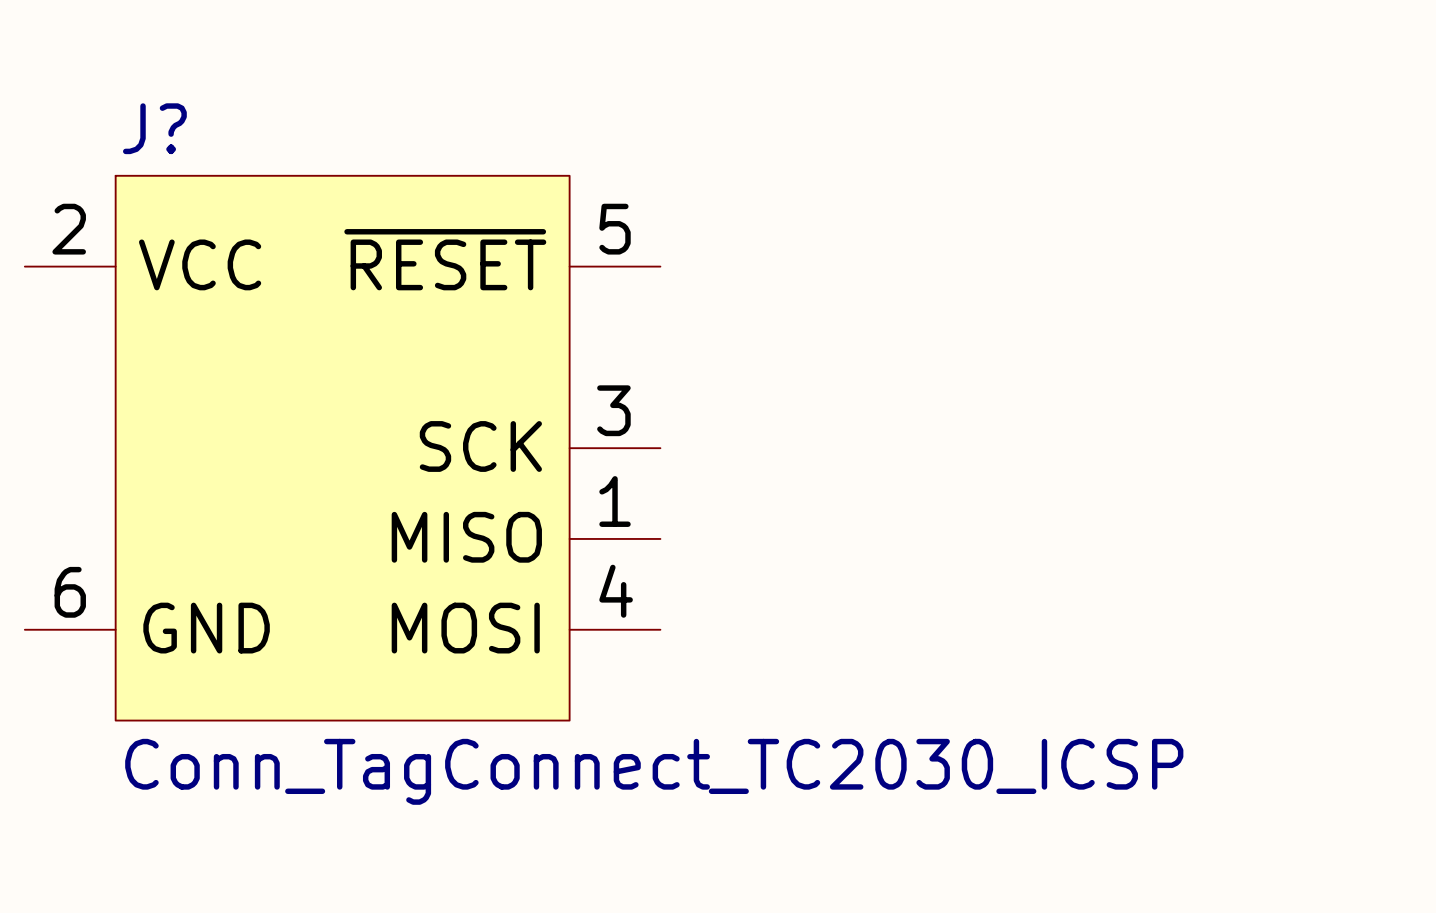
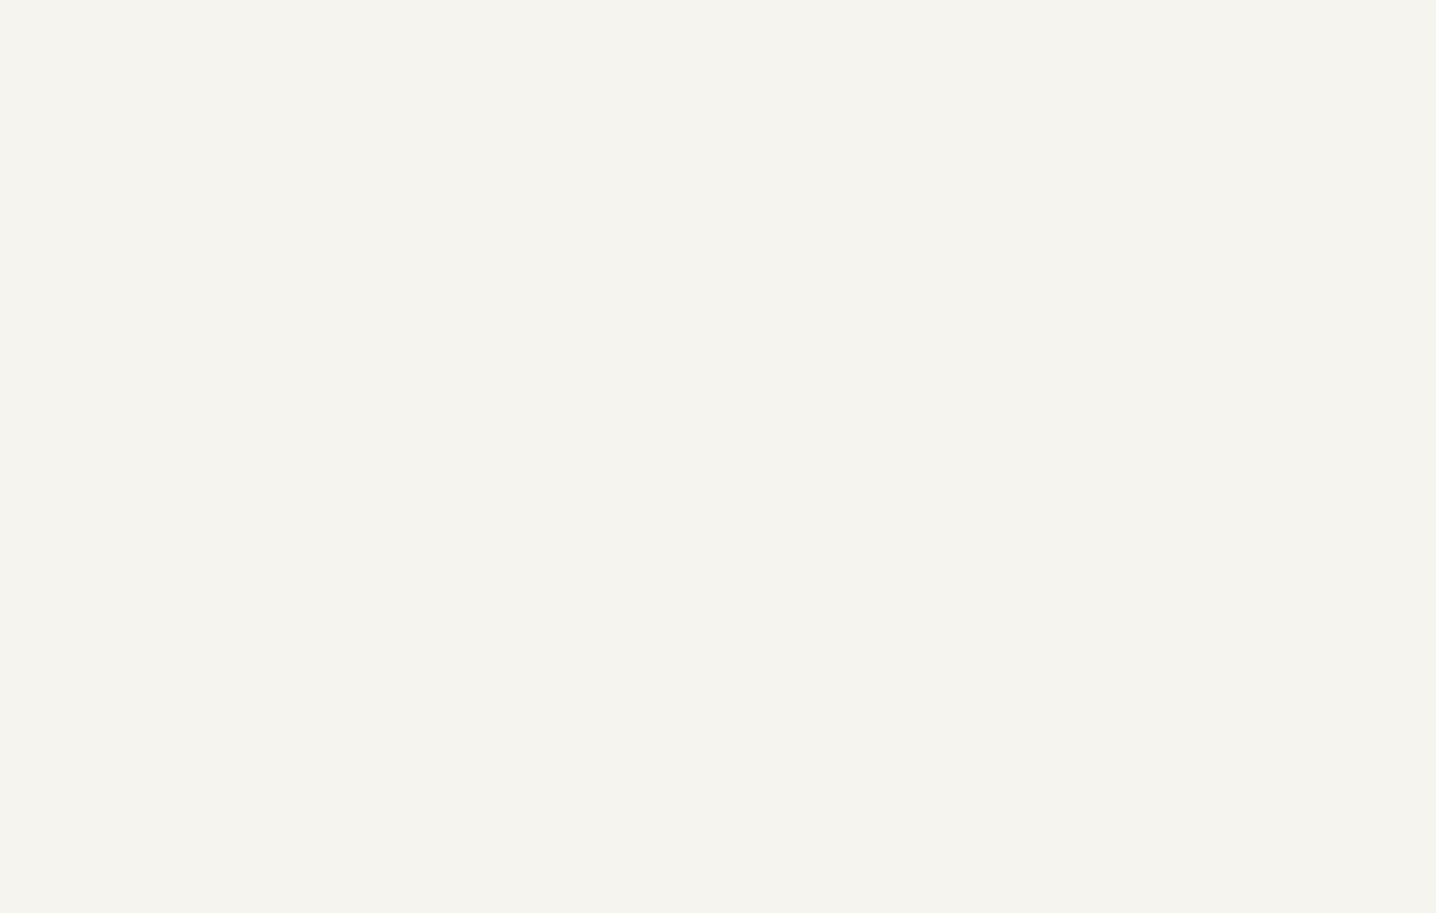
J?: Conn_TagConnect_TC2030_ICSP (342, 448) -> none

